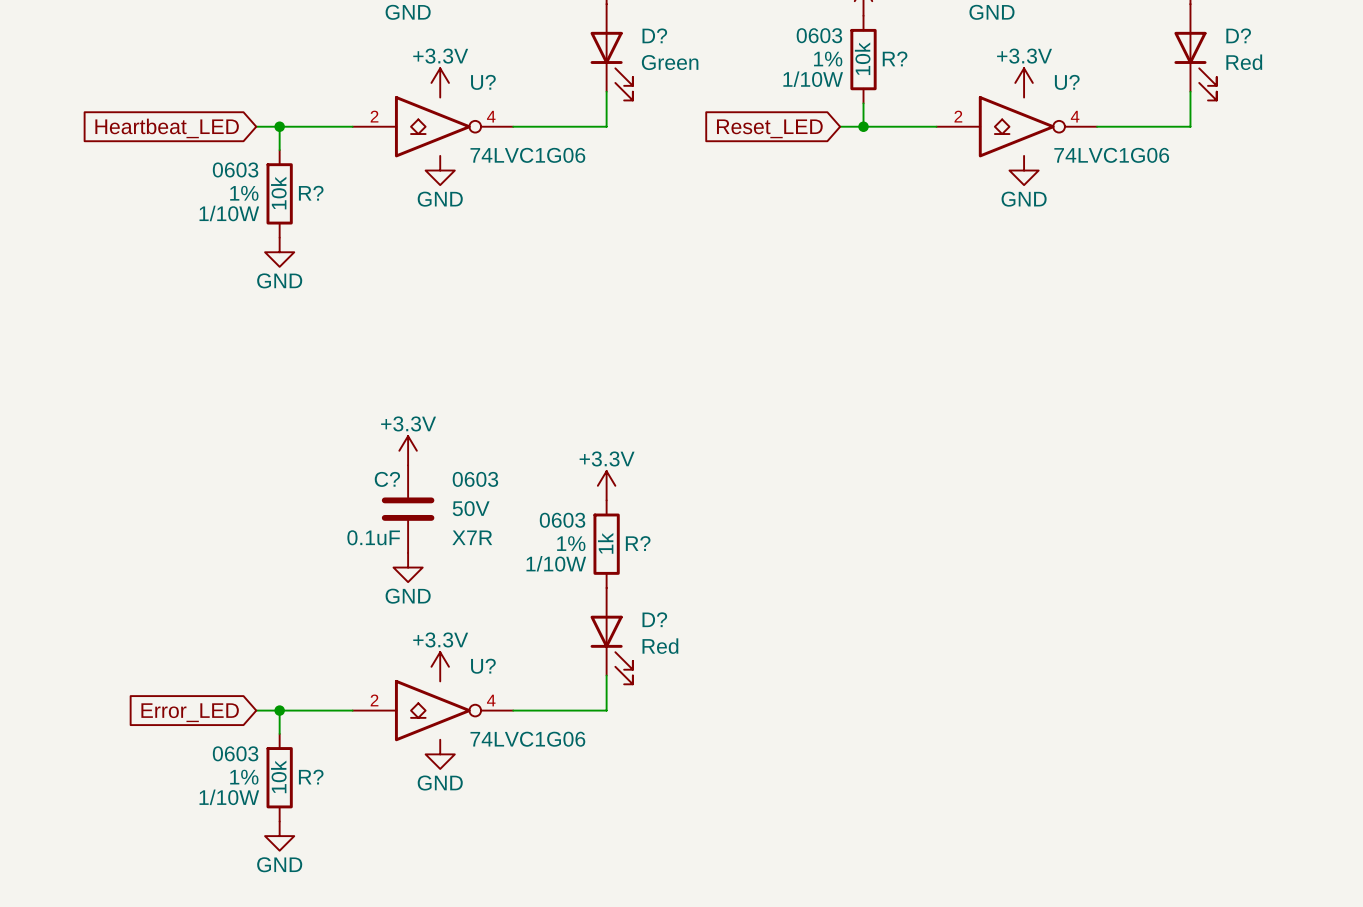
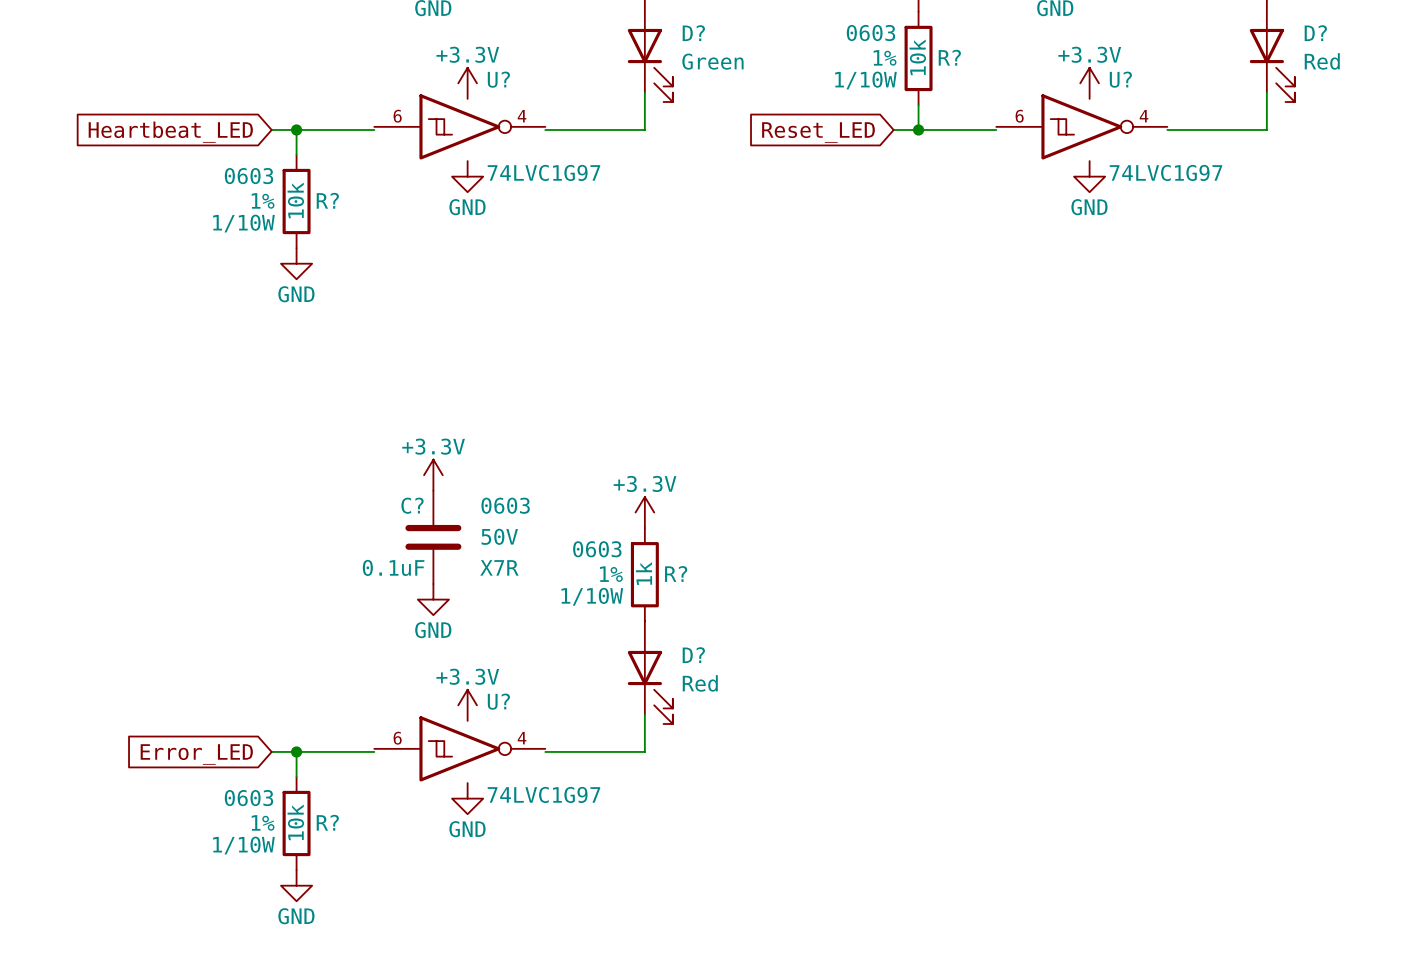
U? symbol: [352, 96, 514, 158] -> [374, 94, 546, 160]
U? symbol: [936, 96, 1098, 158] -> [996, 94, 1168, 160]
U? value: 74LVC1G06 (527, 155) -> 74LVC1G97 (543, 172)
U? value: 74LVC1G06 (1111, 155) -> 74LVC1G97 (1165, 172)
U? symbol: [352, 679, 514, 742] -> [374, 716, 546, 782]
U? value: 74LVC1G06 (527, 739) -> 74LVC1G97 (543, 794)

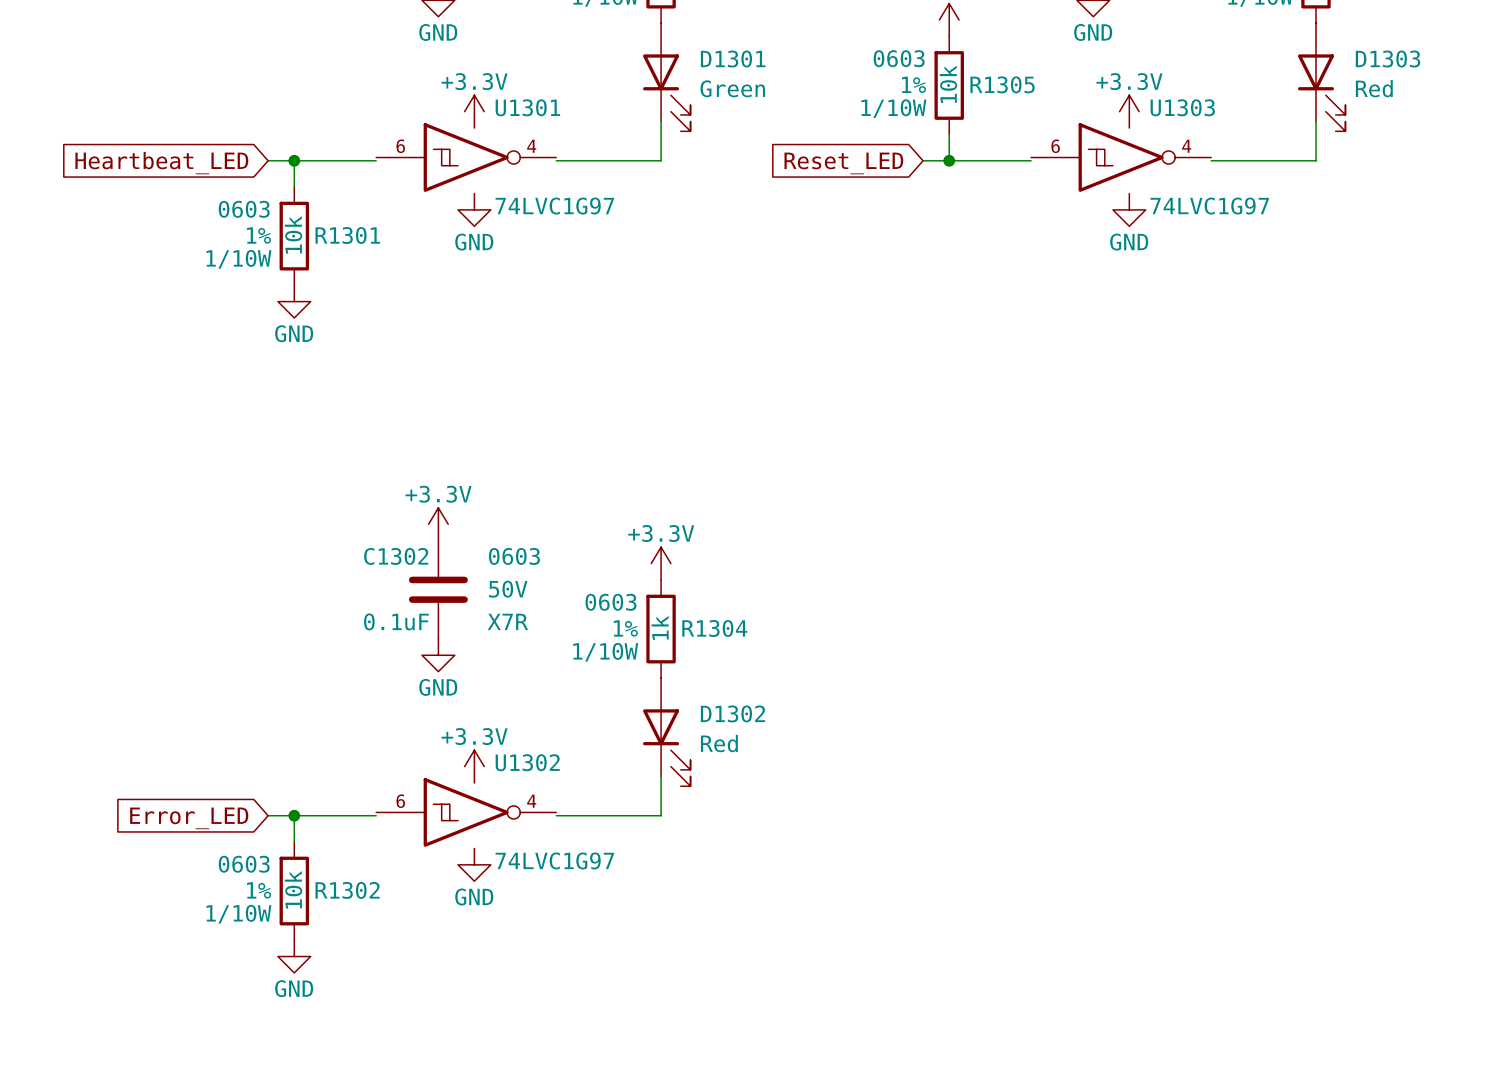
D? name: D? (693, 33) -> D1301 (733, 59)
D? name: D? (1315, 33) -> D1303 (1388, 59)
R? name: R? (949, 57) -> R1305 (1002, 84)
U? name: U? (498, 79) -> U1301 (527, 107)
U? name: U? (1120, 79) -> U1303 (1182, 107)
R? name: R? (327, 200) -> R1301 (347, 235)
C? name: C? (412, 505) -> C1302 (396, 556)
R? name: R? (676, 573) -> R1304 (714, 628)
D? name: D? (693, 655) -> D1302 (732, 713)
U? name: U? (498, 701) -> U1302 (527, 762)
R? name: R? (327, 822) -> R1302 (347, 890)

